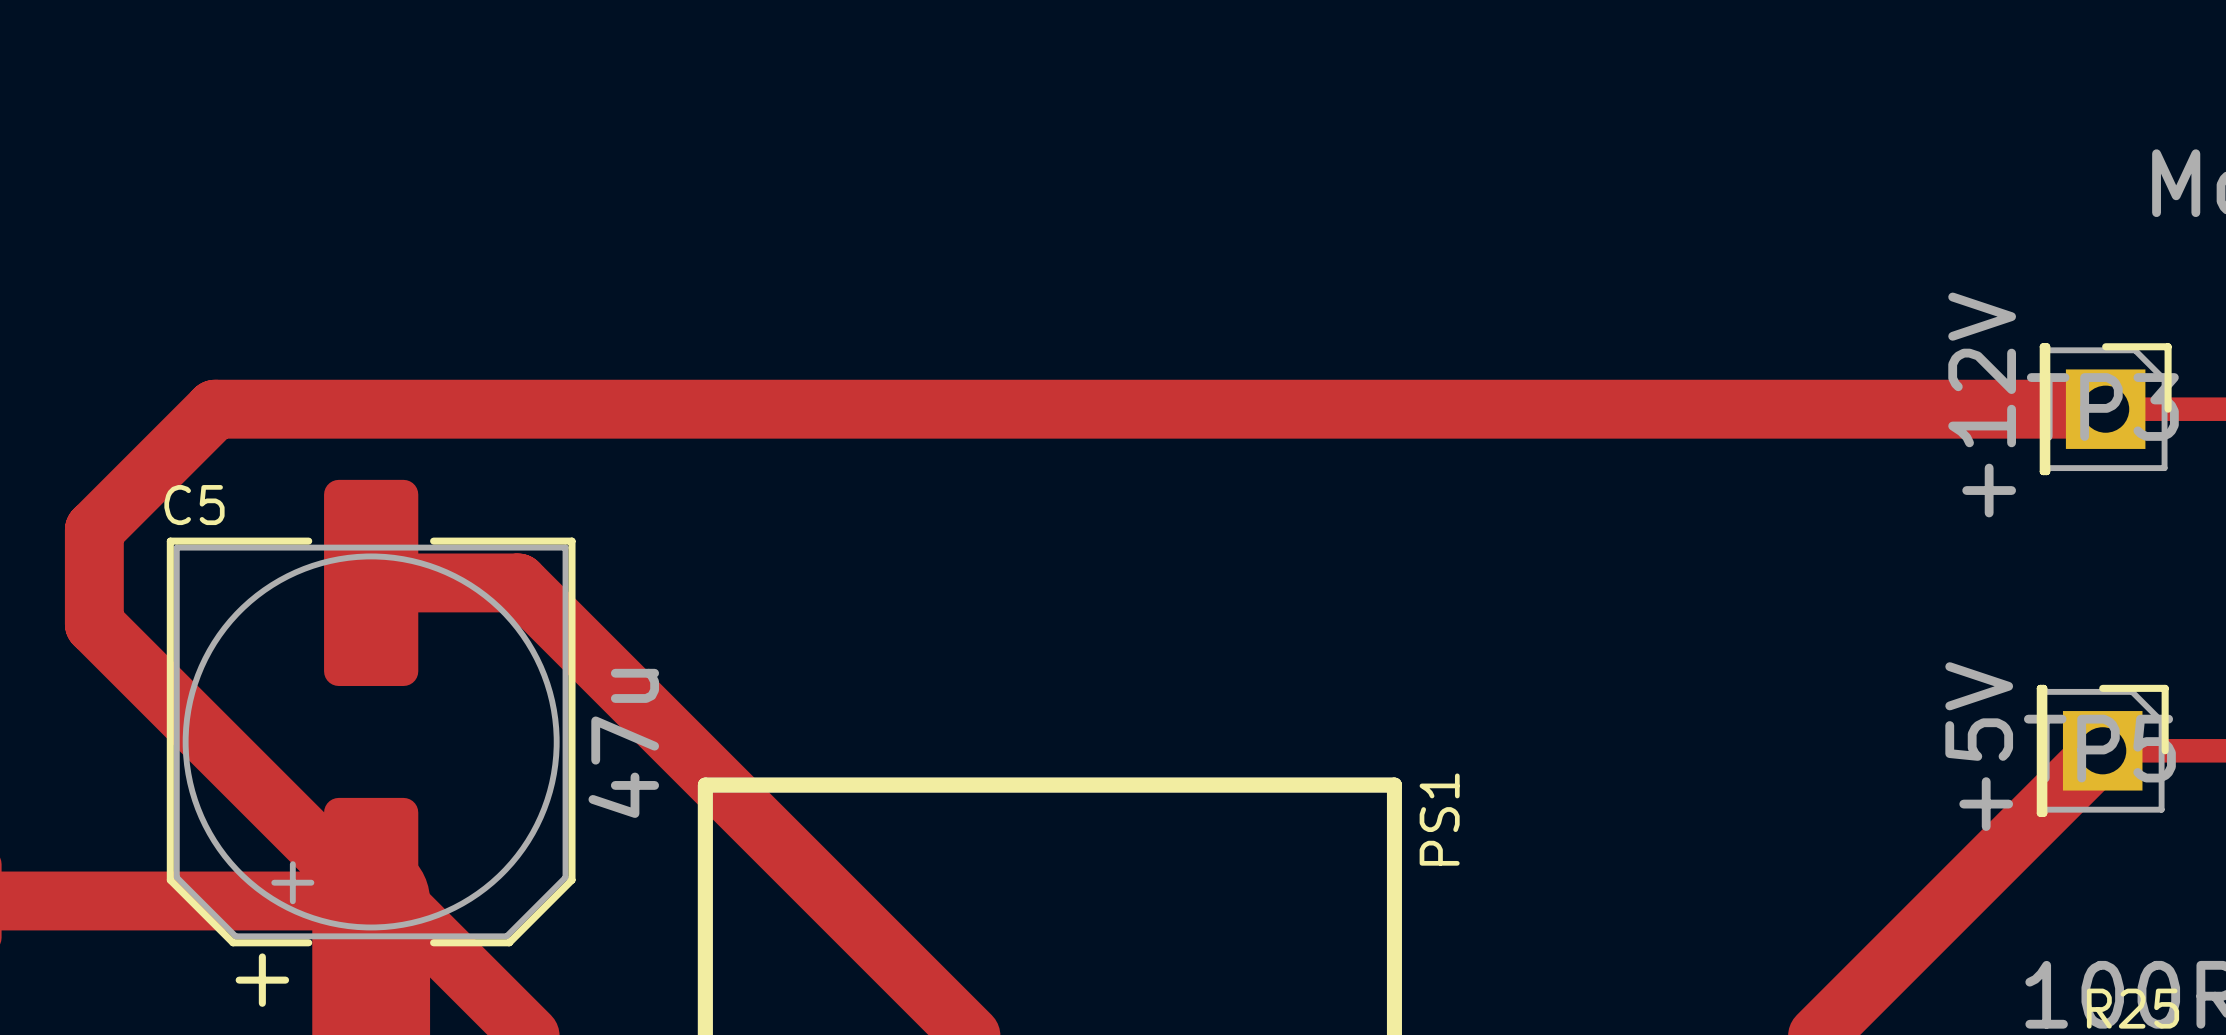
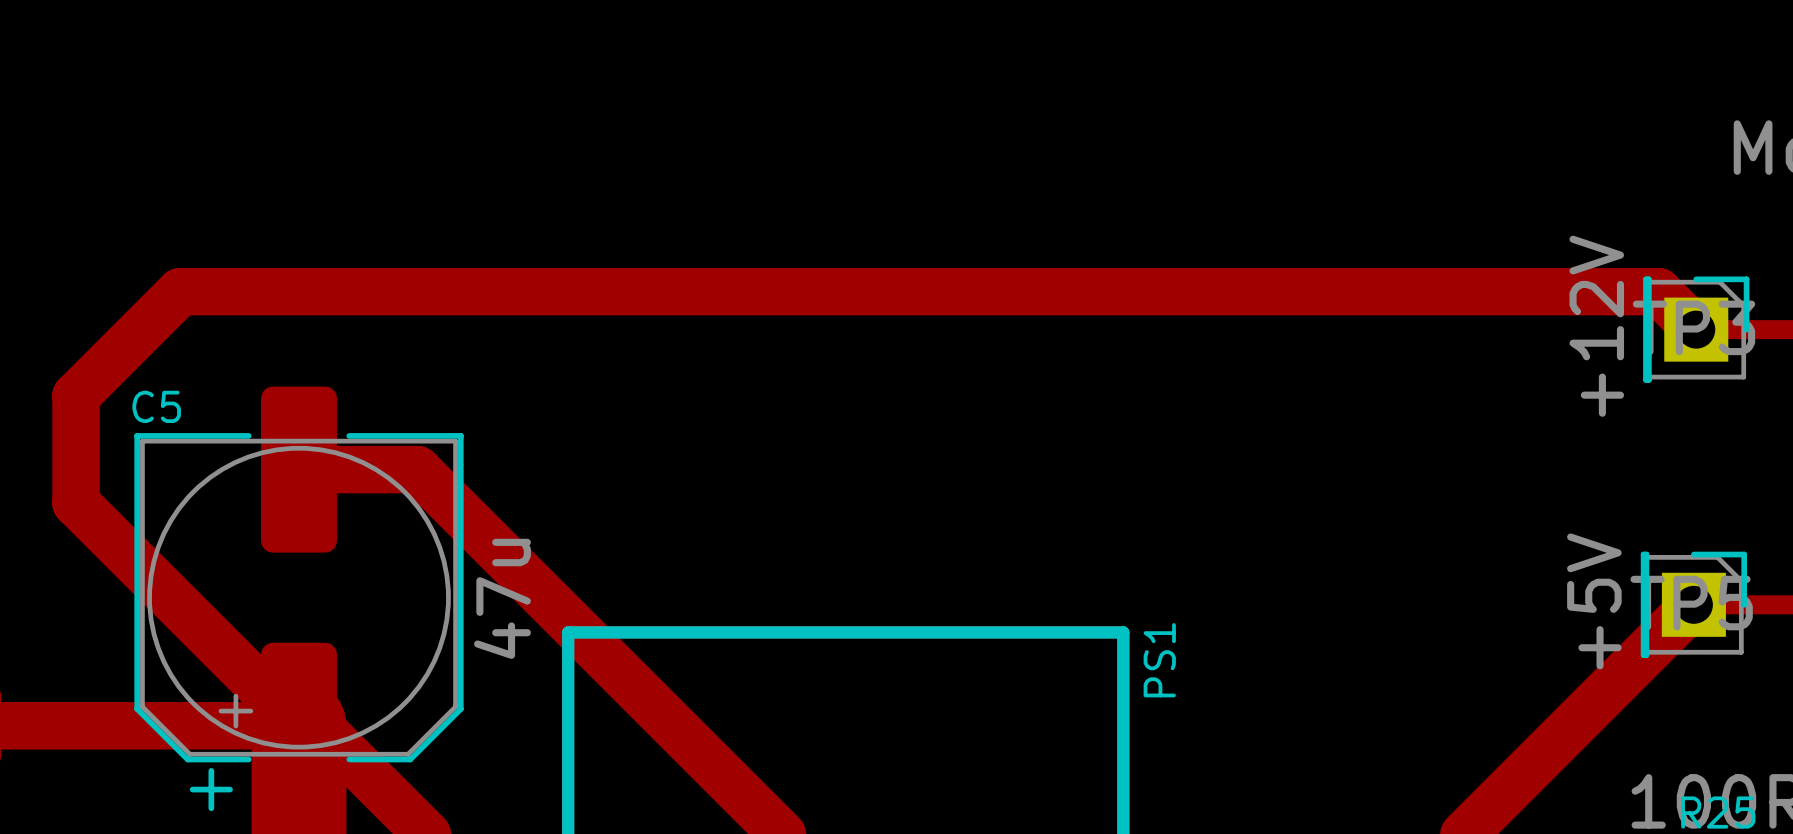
top track: (2105, 409) (215, 409) (94, 529) -> (1696, 329) (1658, 291) (180, 291) (76, 396) (76, 426)

